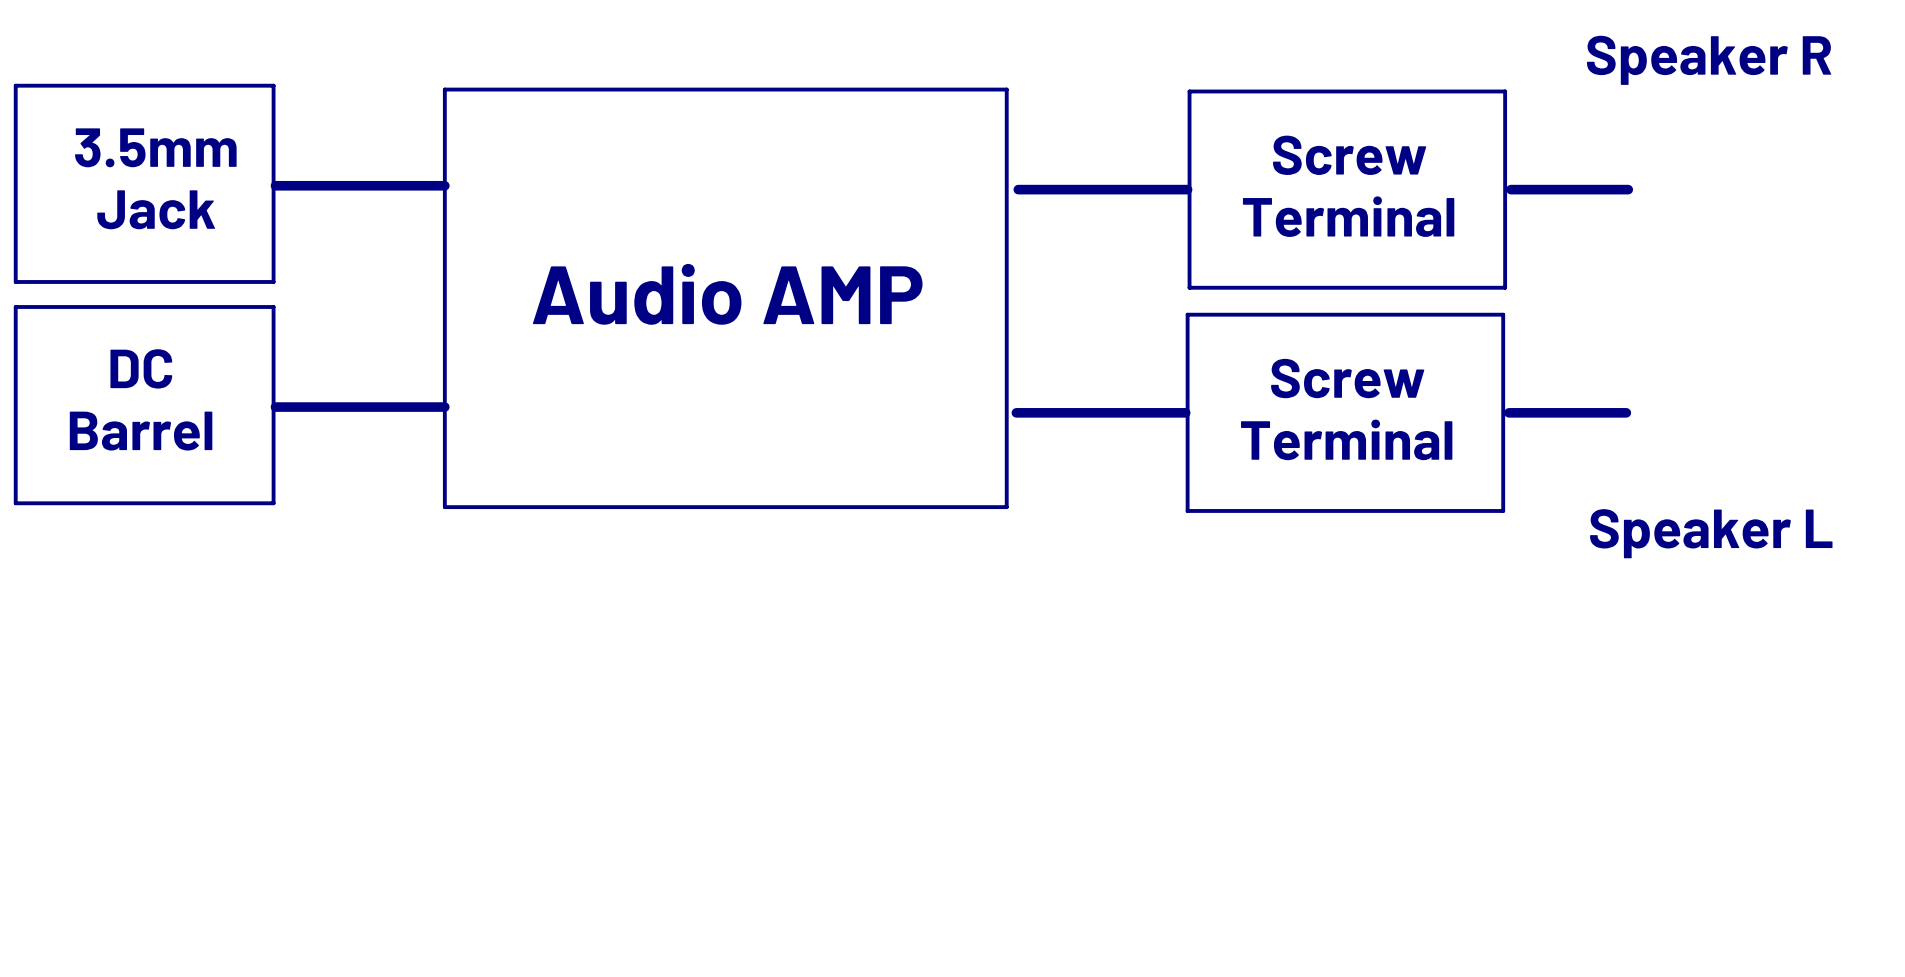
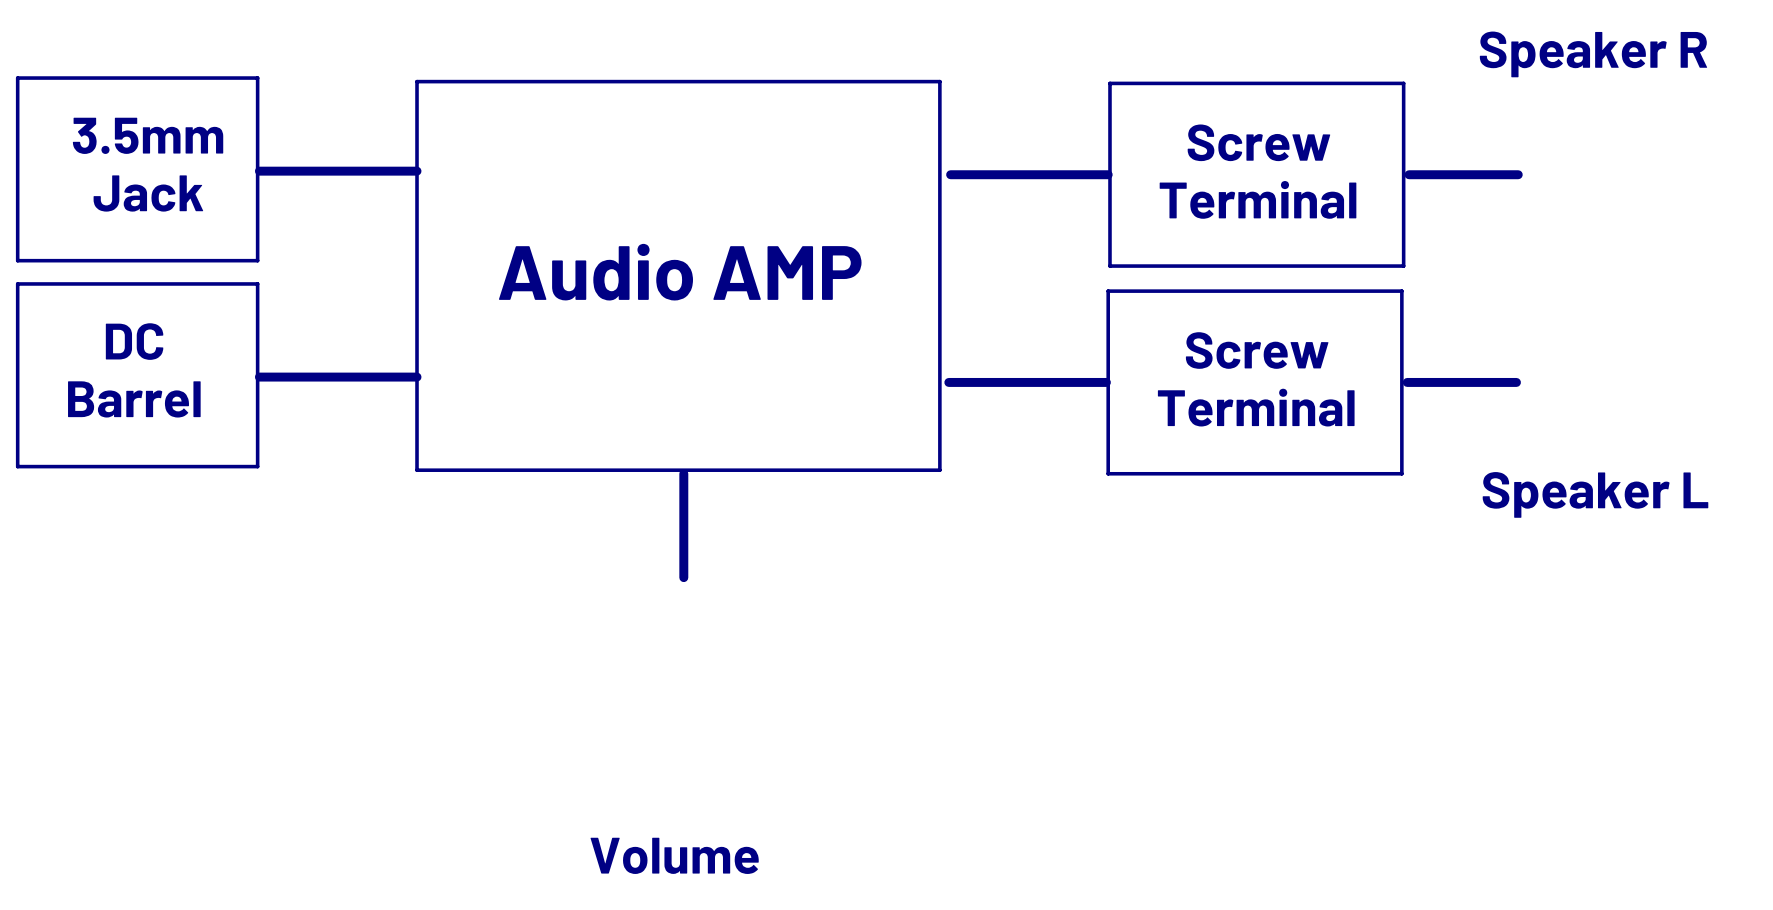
line: none -> (683, 473) (683, 577)
text: none -> Volume (674, 855)

